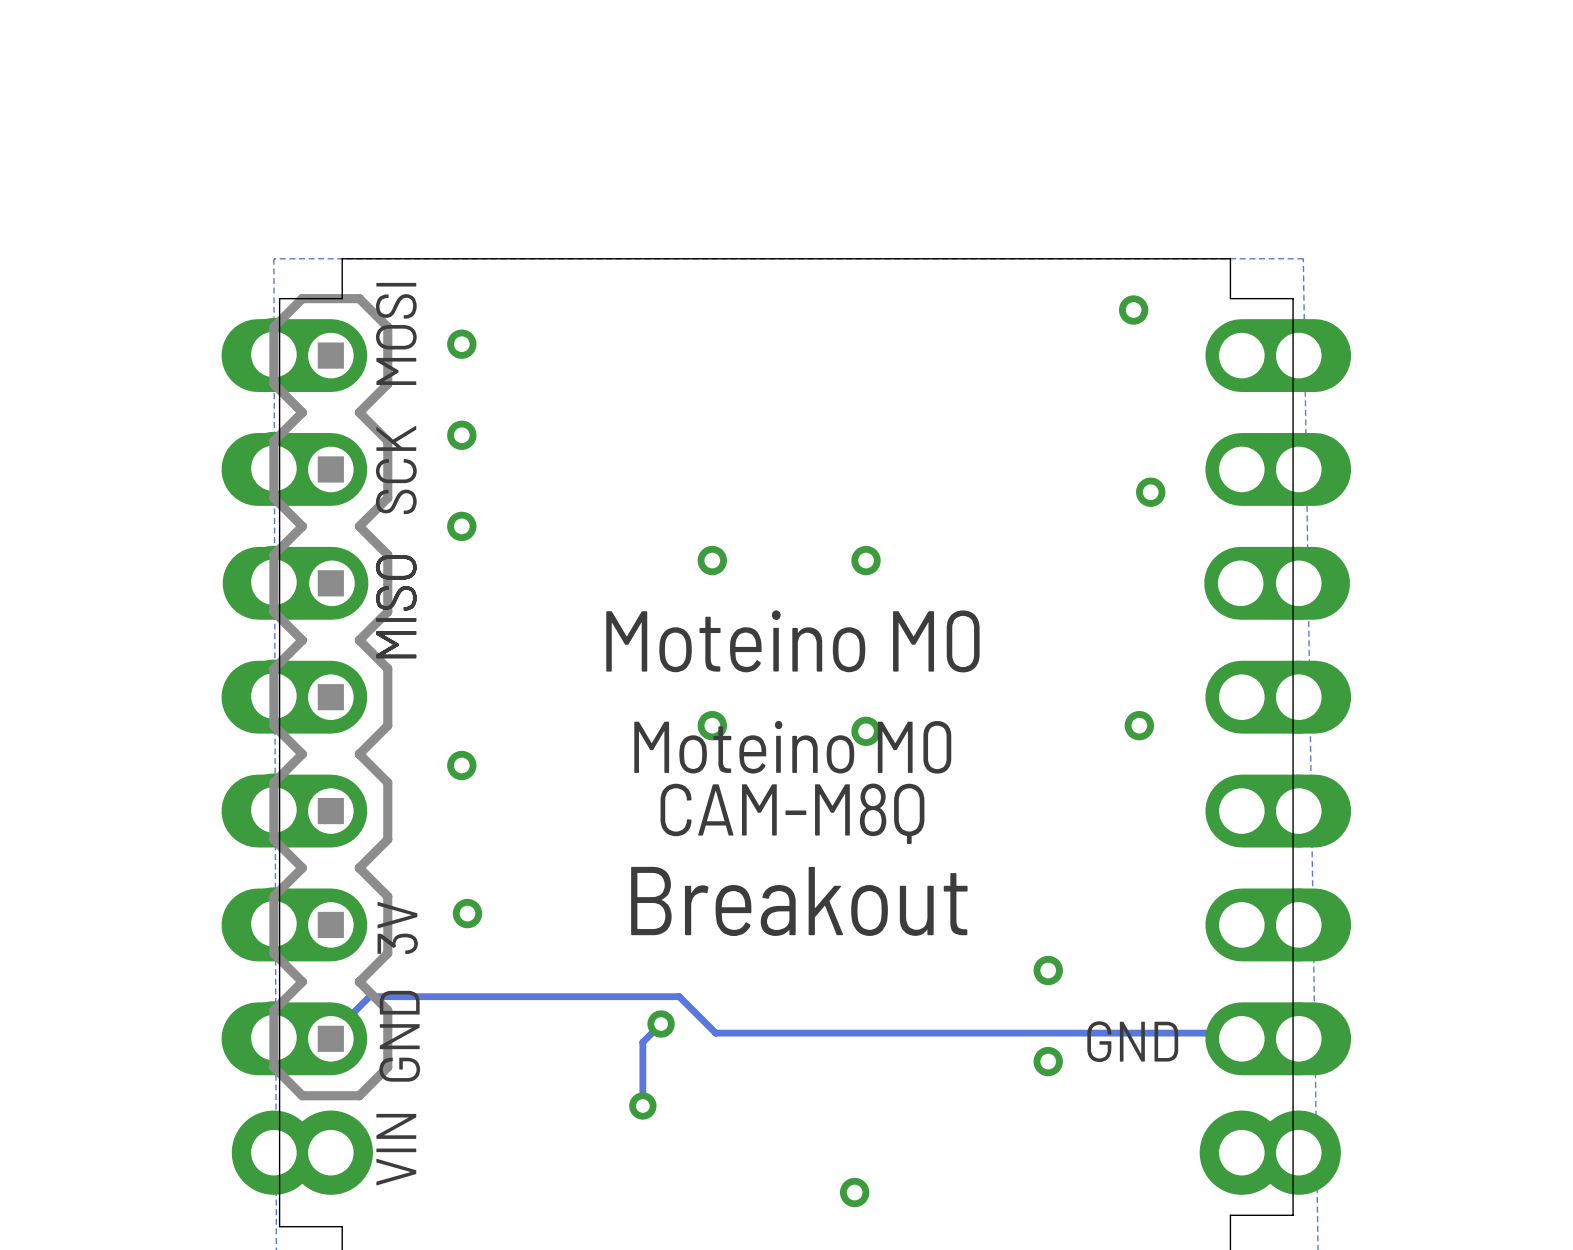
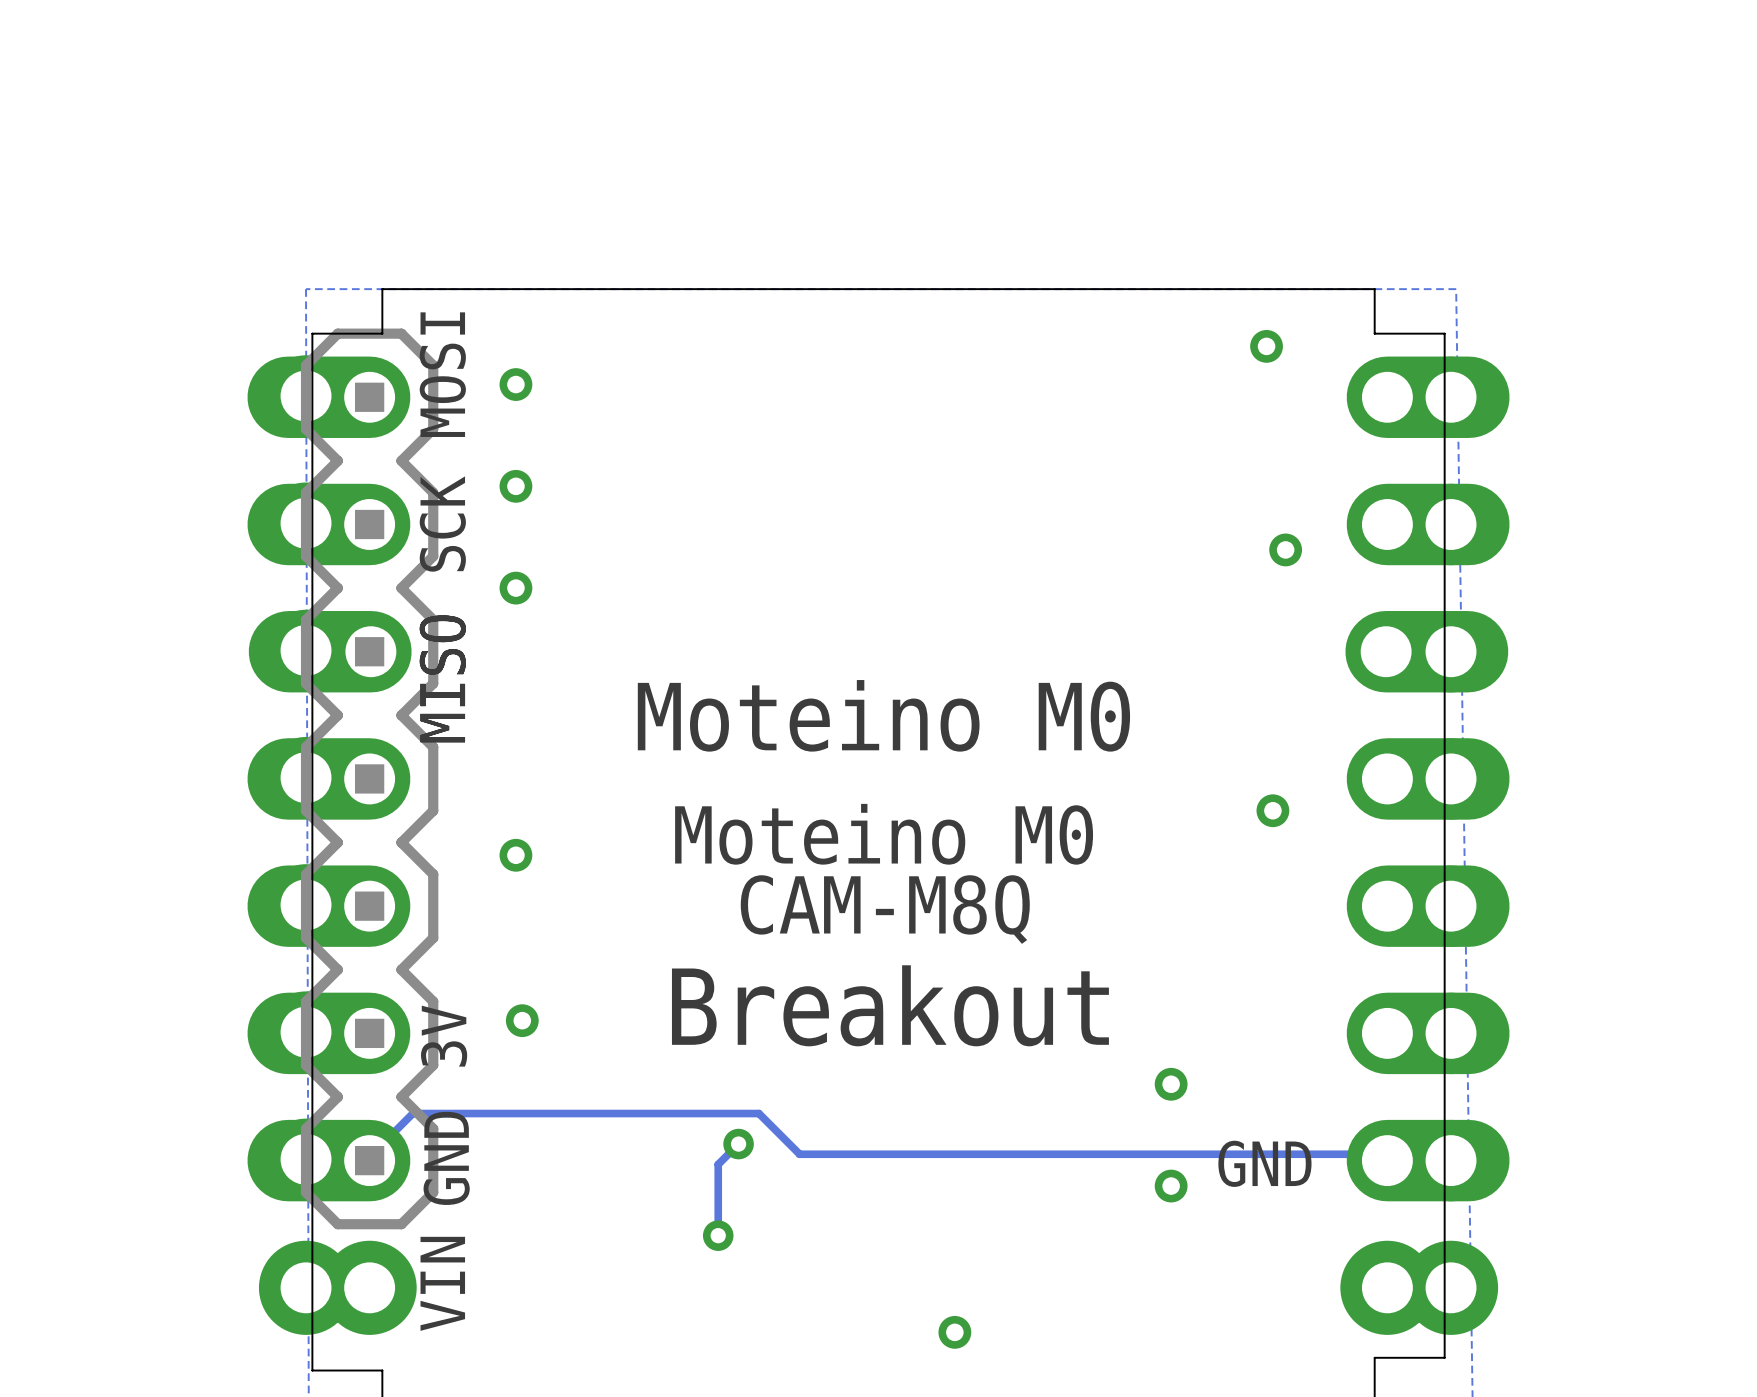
via: (712, 560) -> none
via: (866, 560) -> none
via: (712, 725) -> none
via: (866, 731) -> none

